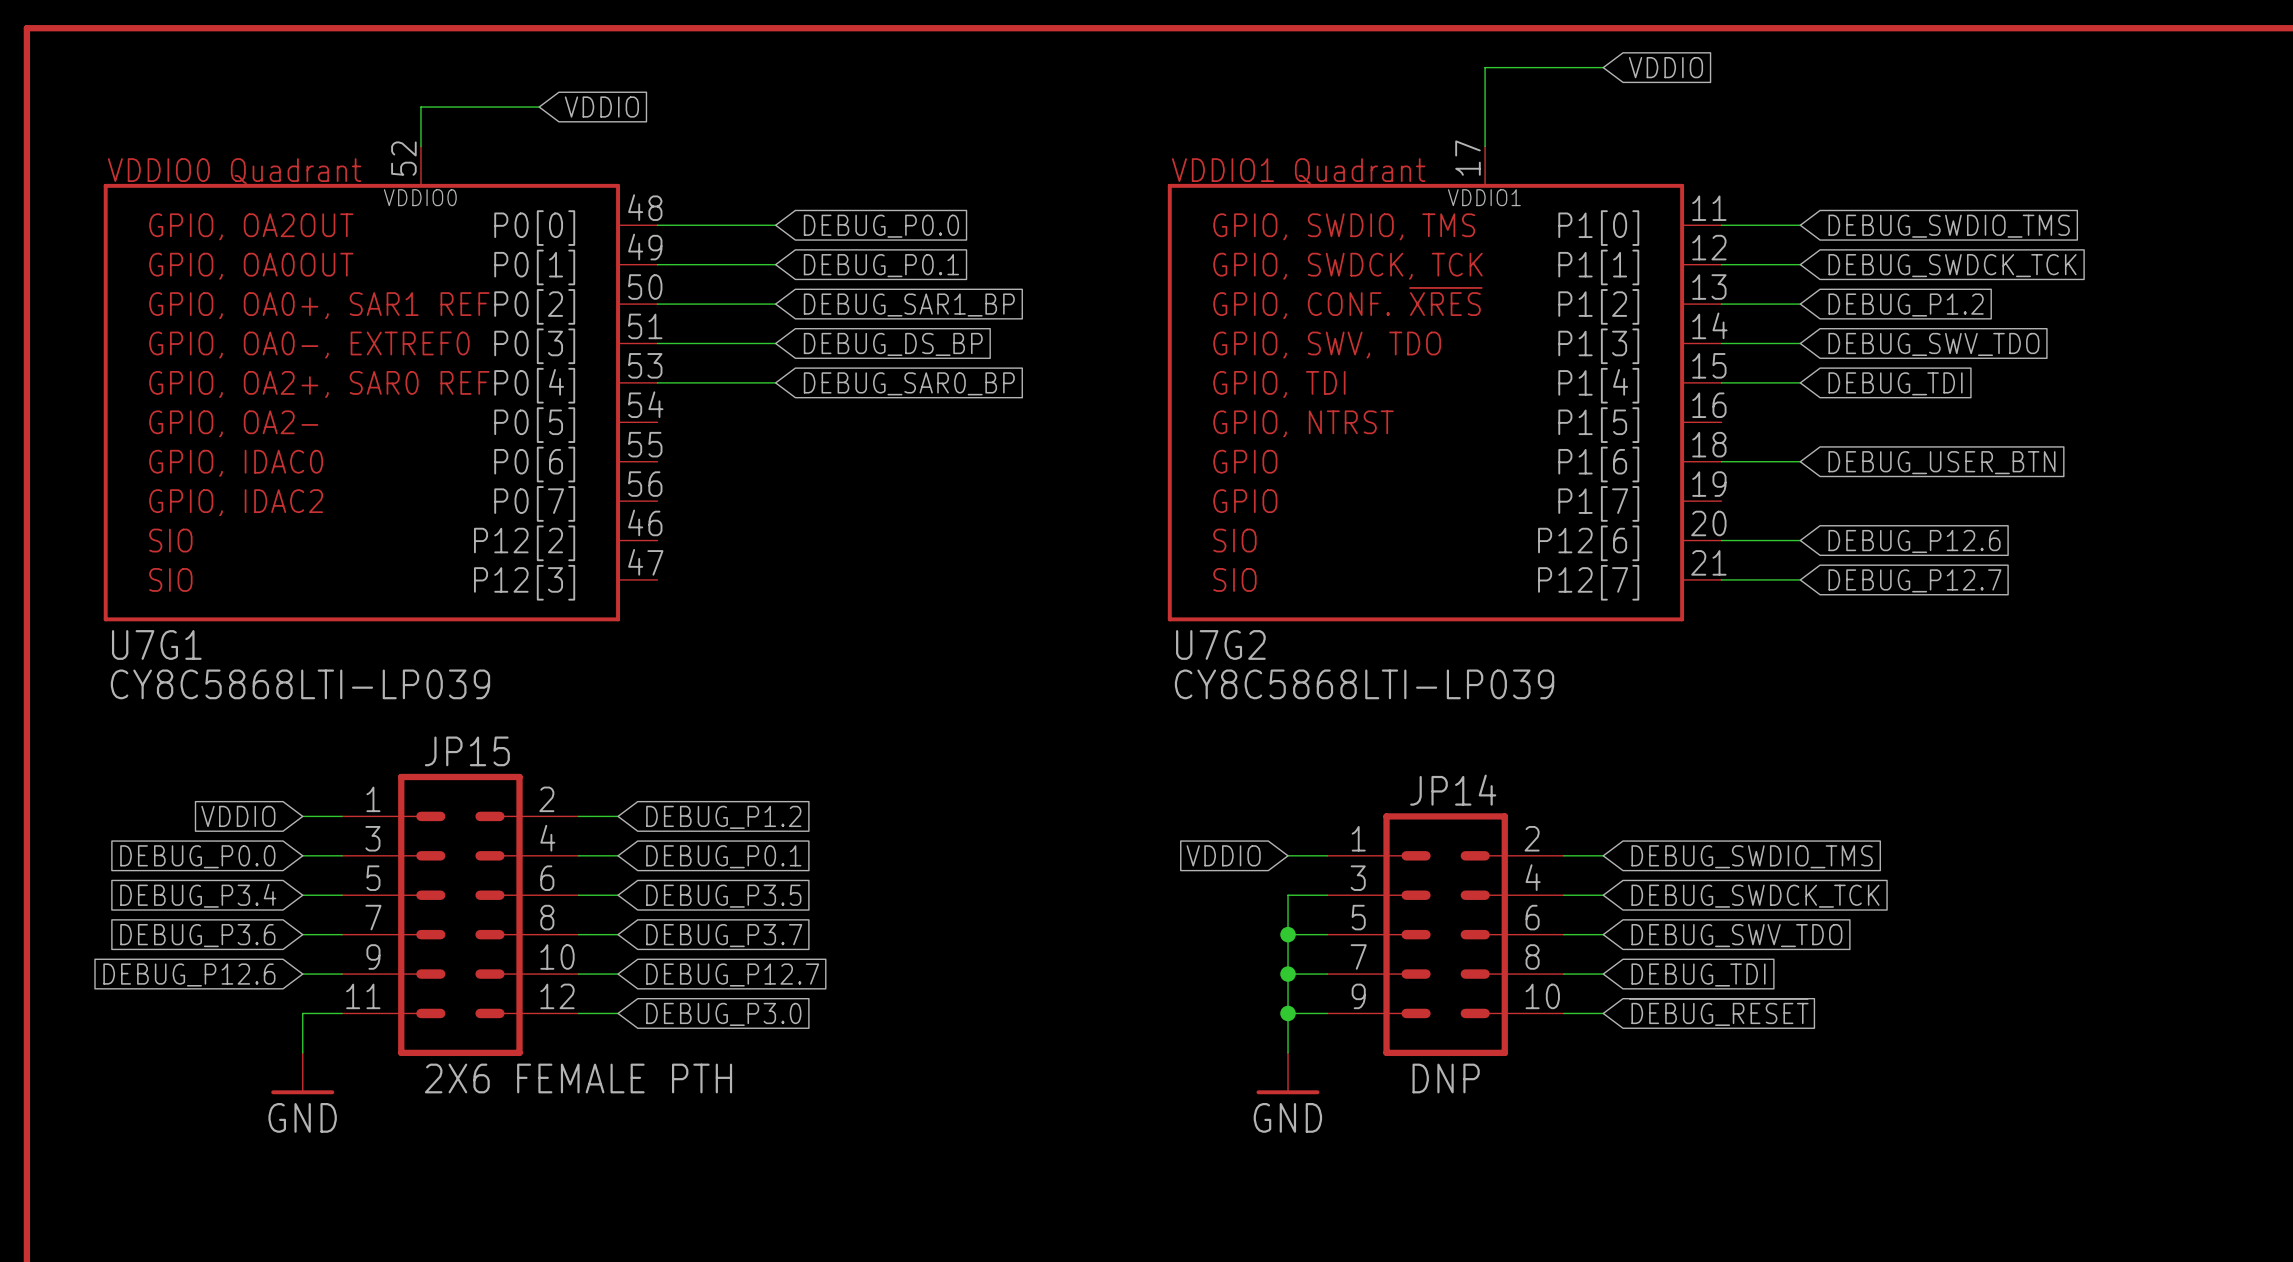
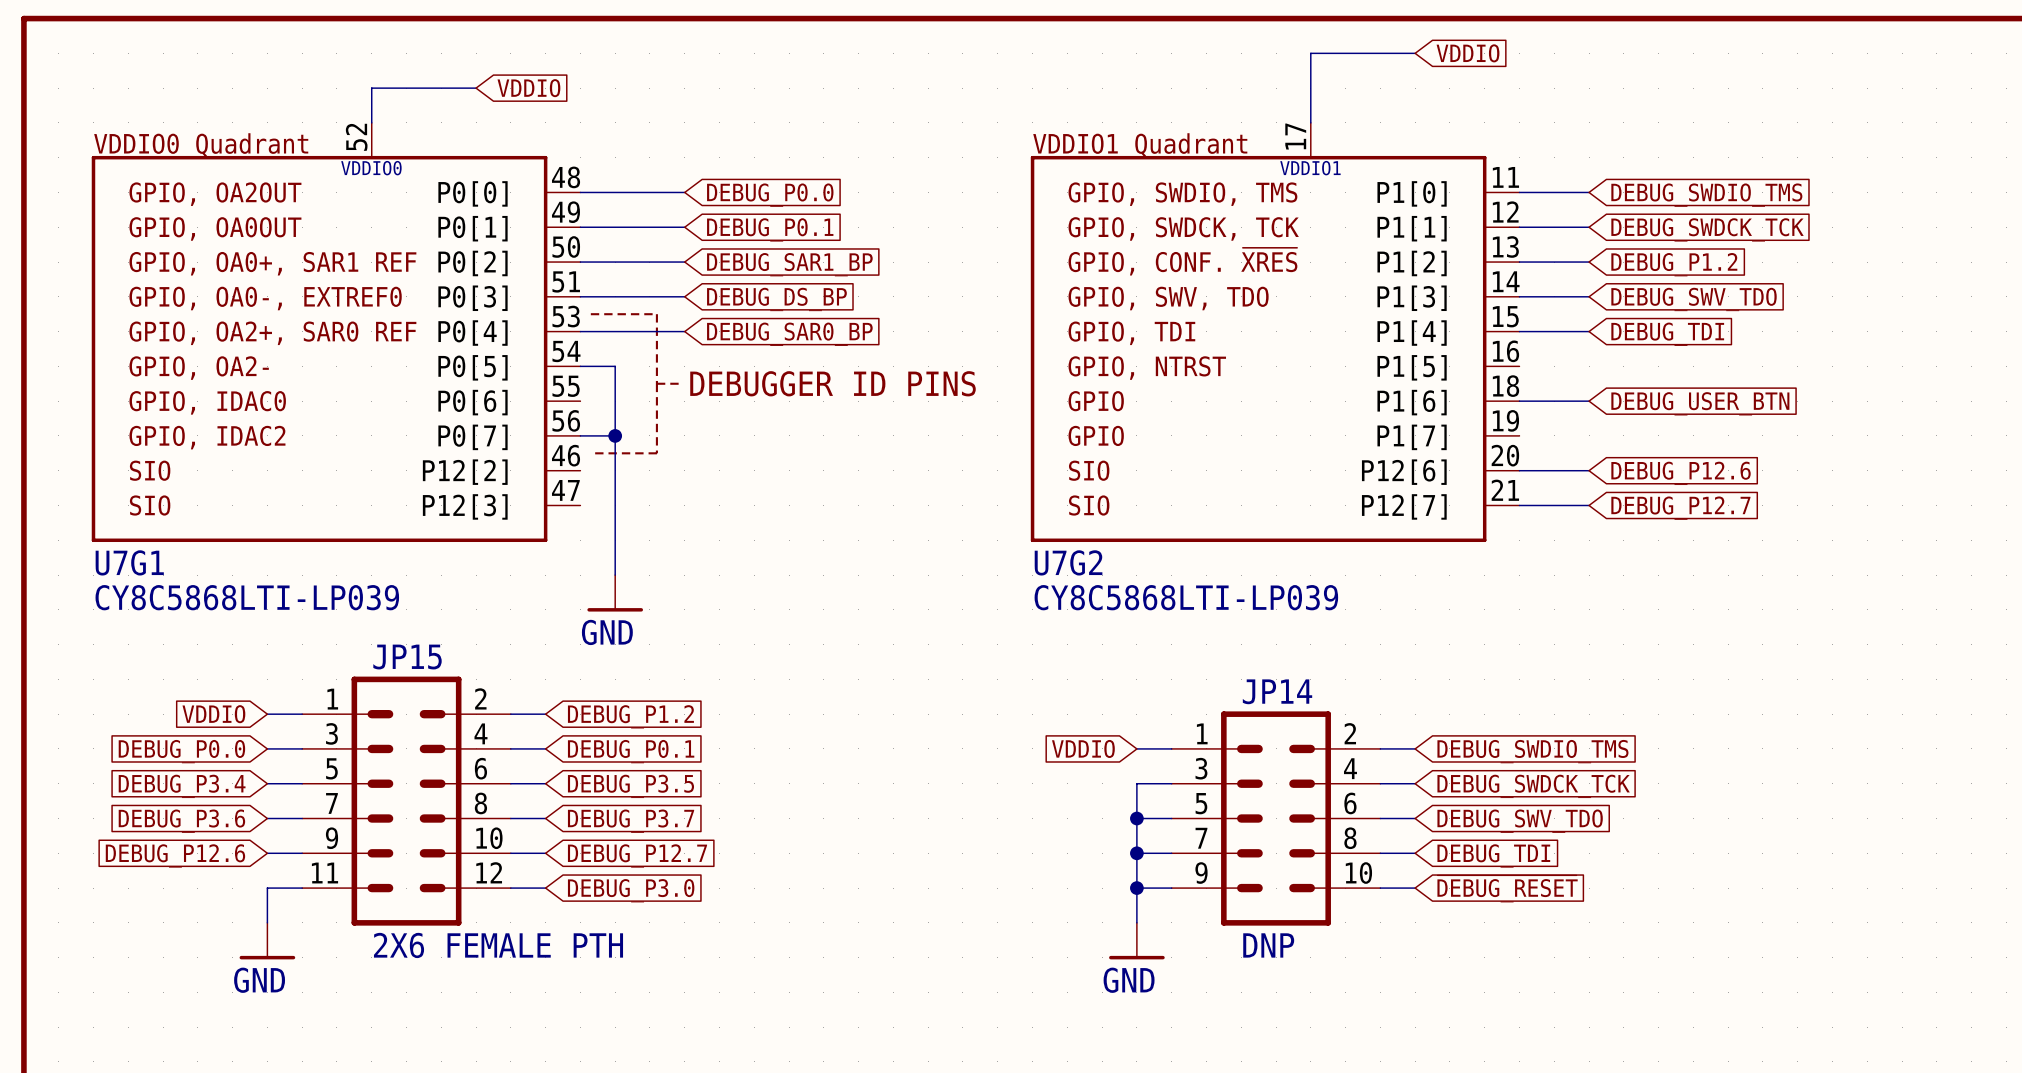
line: none -> (590, 314) (656, 314) (656, 453) (590, 453)
wire: none -> (580, 366) (615, 366) (615, 575)
line: none -> (656, 383) (681, 383)
text: none -> DEBUGGER ID PINS (833, 383)
wire: none -> (580, 435) (615, 435)
junction: none -> (615, 435)
power symbol: none -> GND (615, 593)

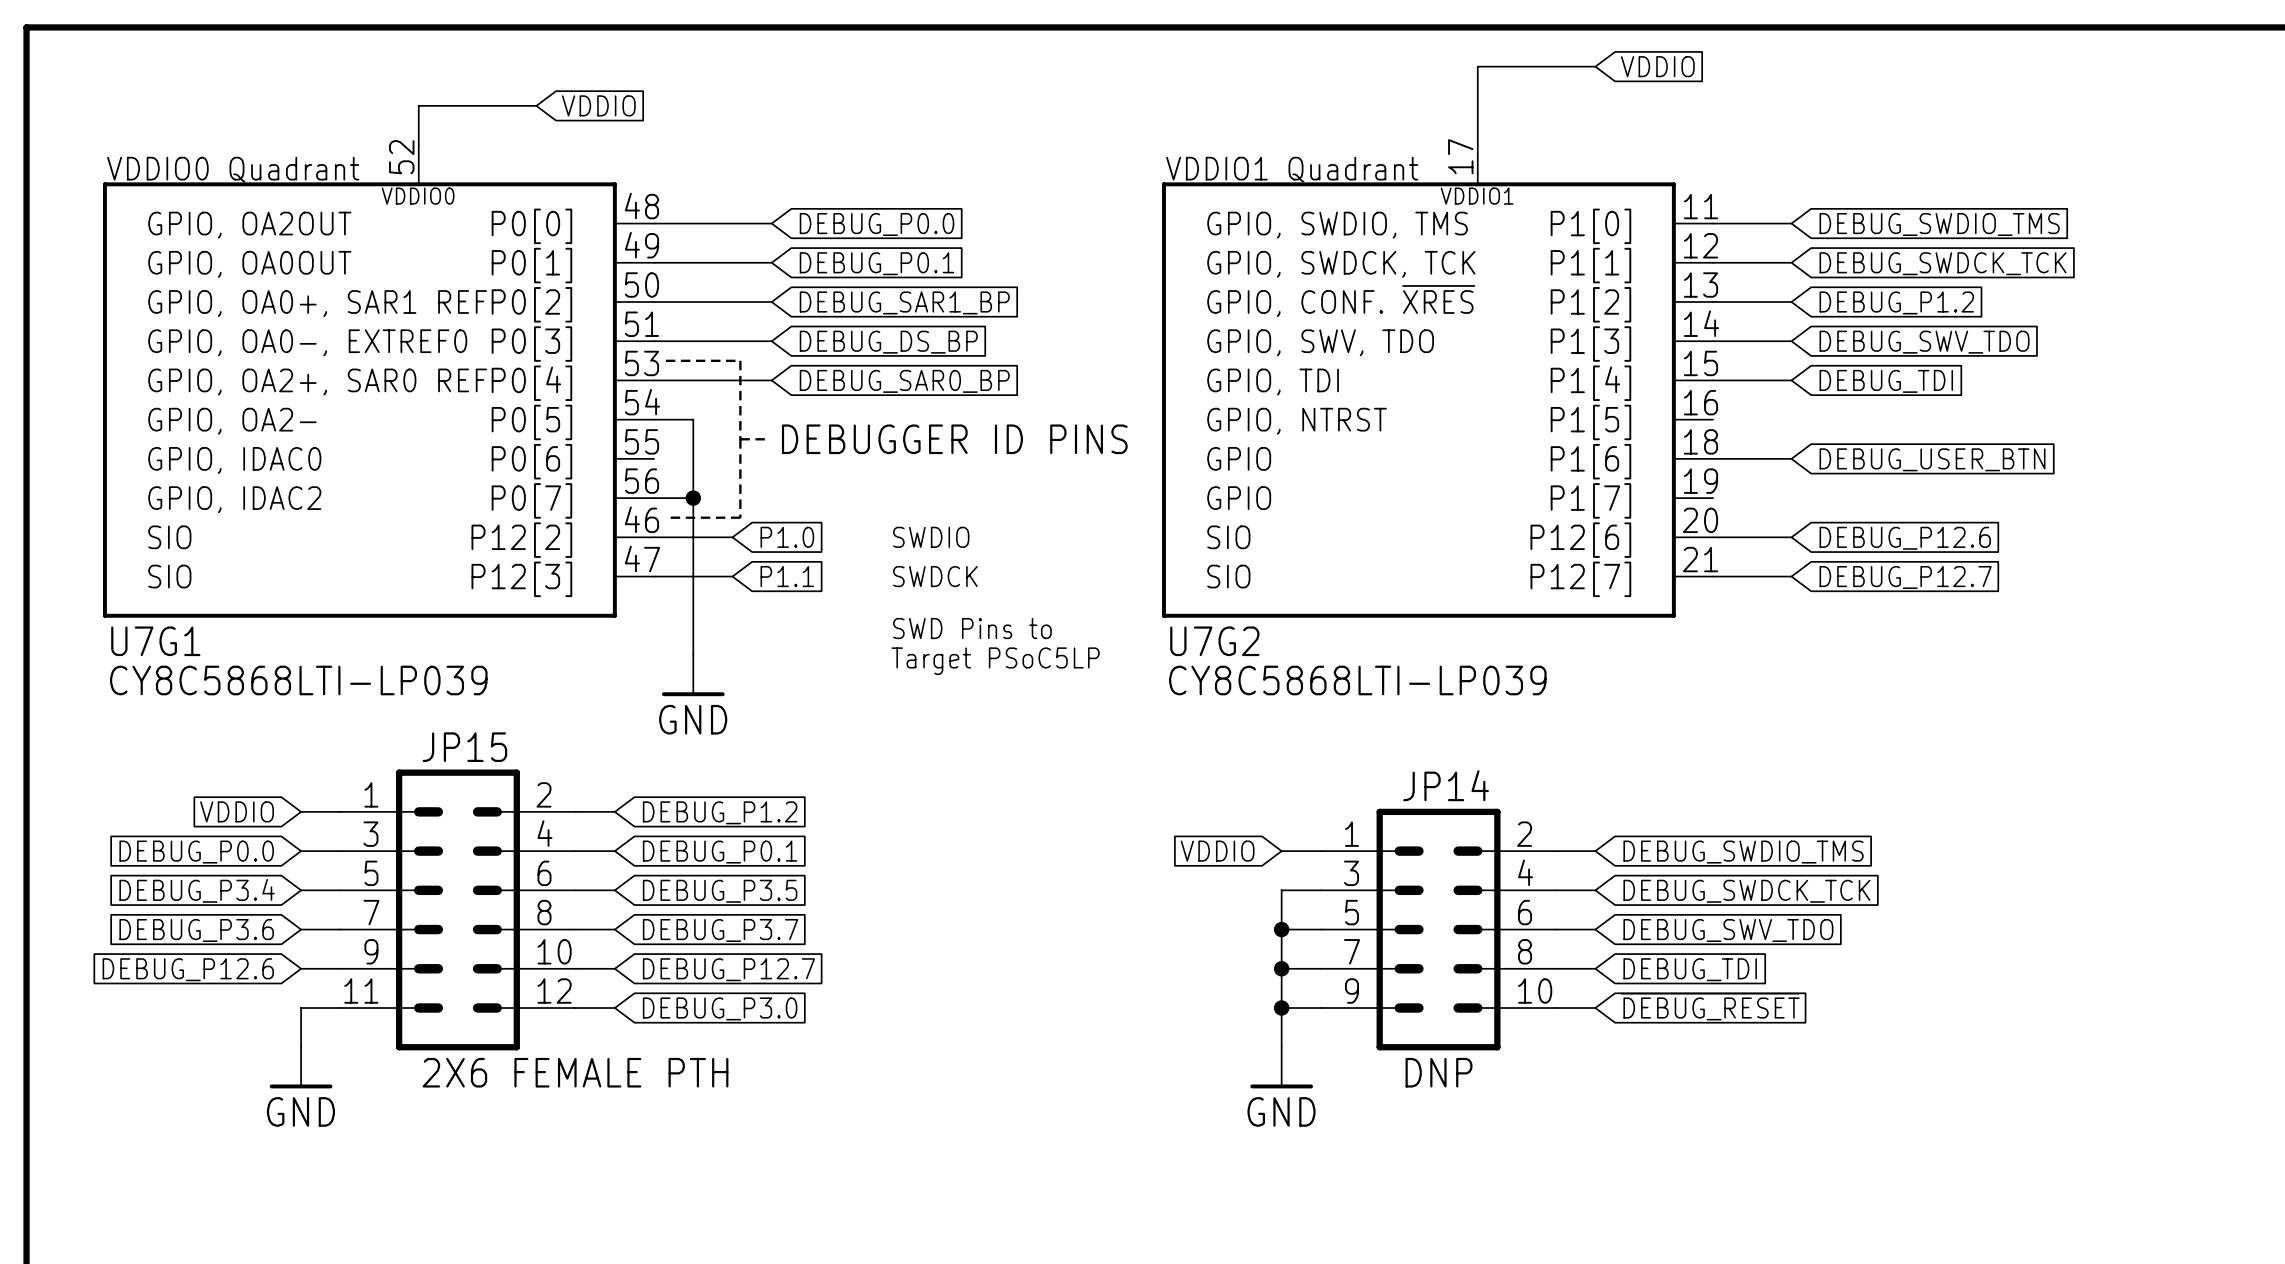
wire: none -> (654, 537) (732, 537)
global label: none -> P1.0 (787, 537)
text: none -> SWDIO (931, 537)
wire: none -> (654, 576) (732, 576)
global label: none -> P1.1 (787, 576)
text: none -> SWDCK (935, 576)
text: none -> SWD Pins to (972, 628)
text: none -> Target PSoC5LP (995, 661)

